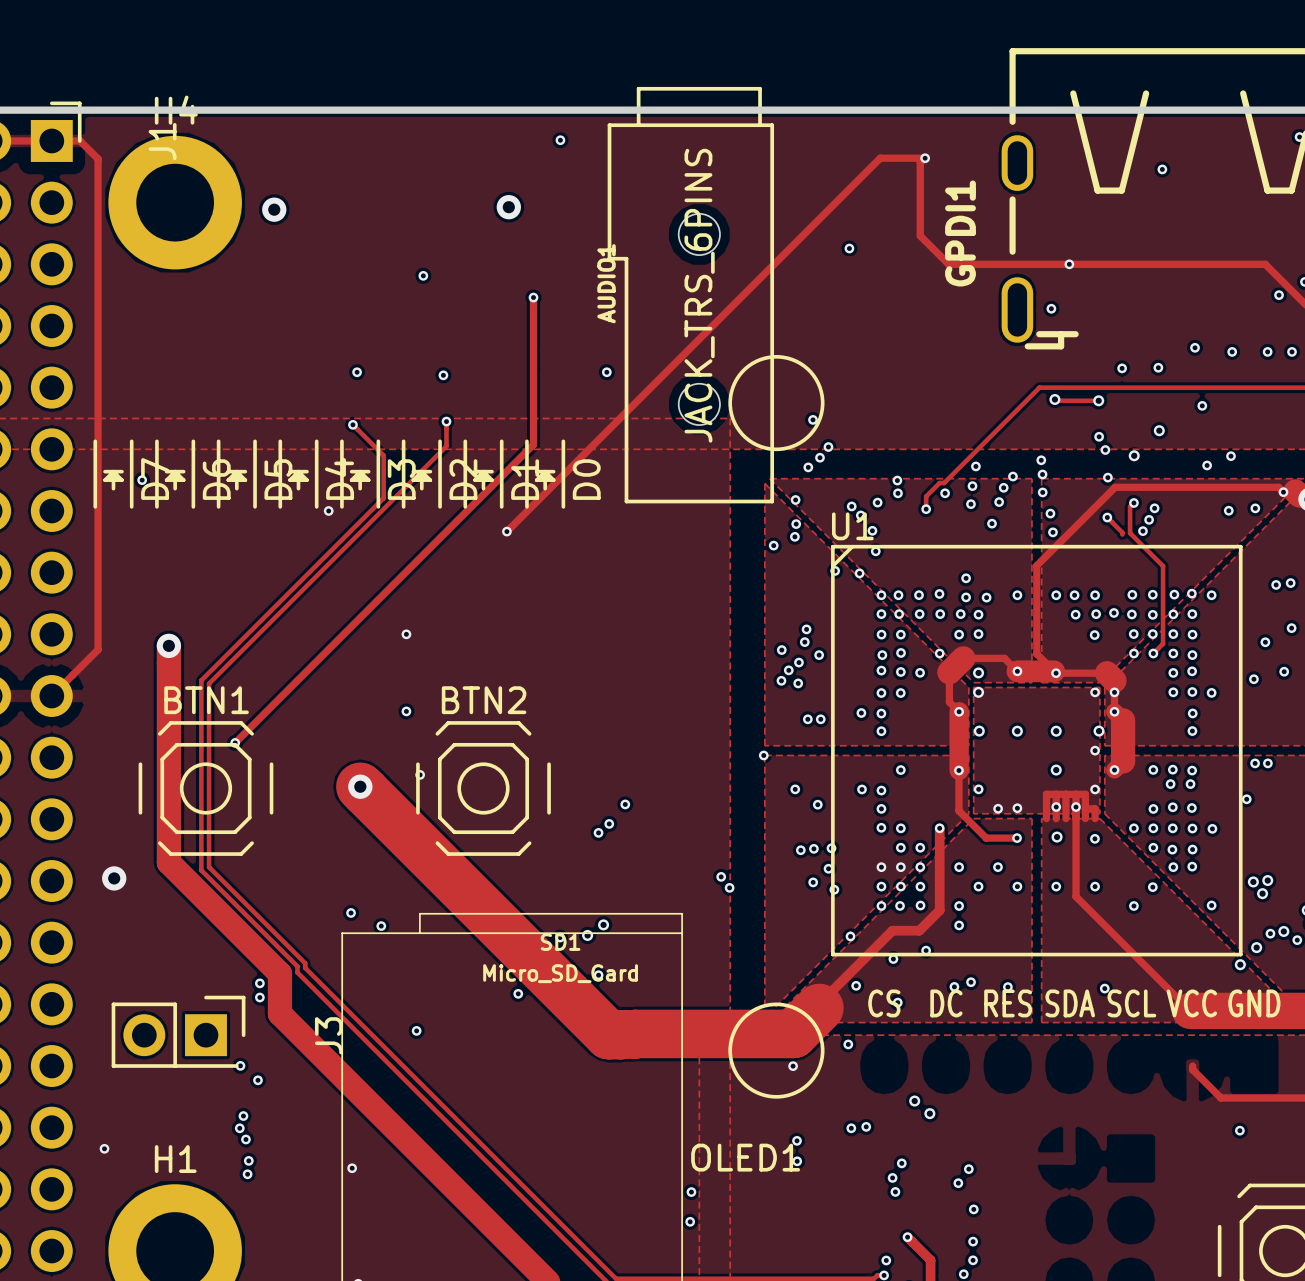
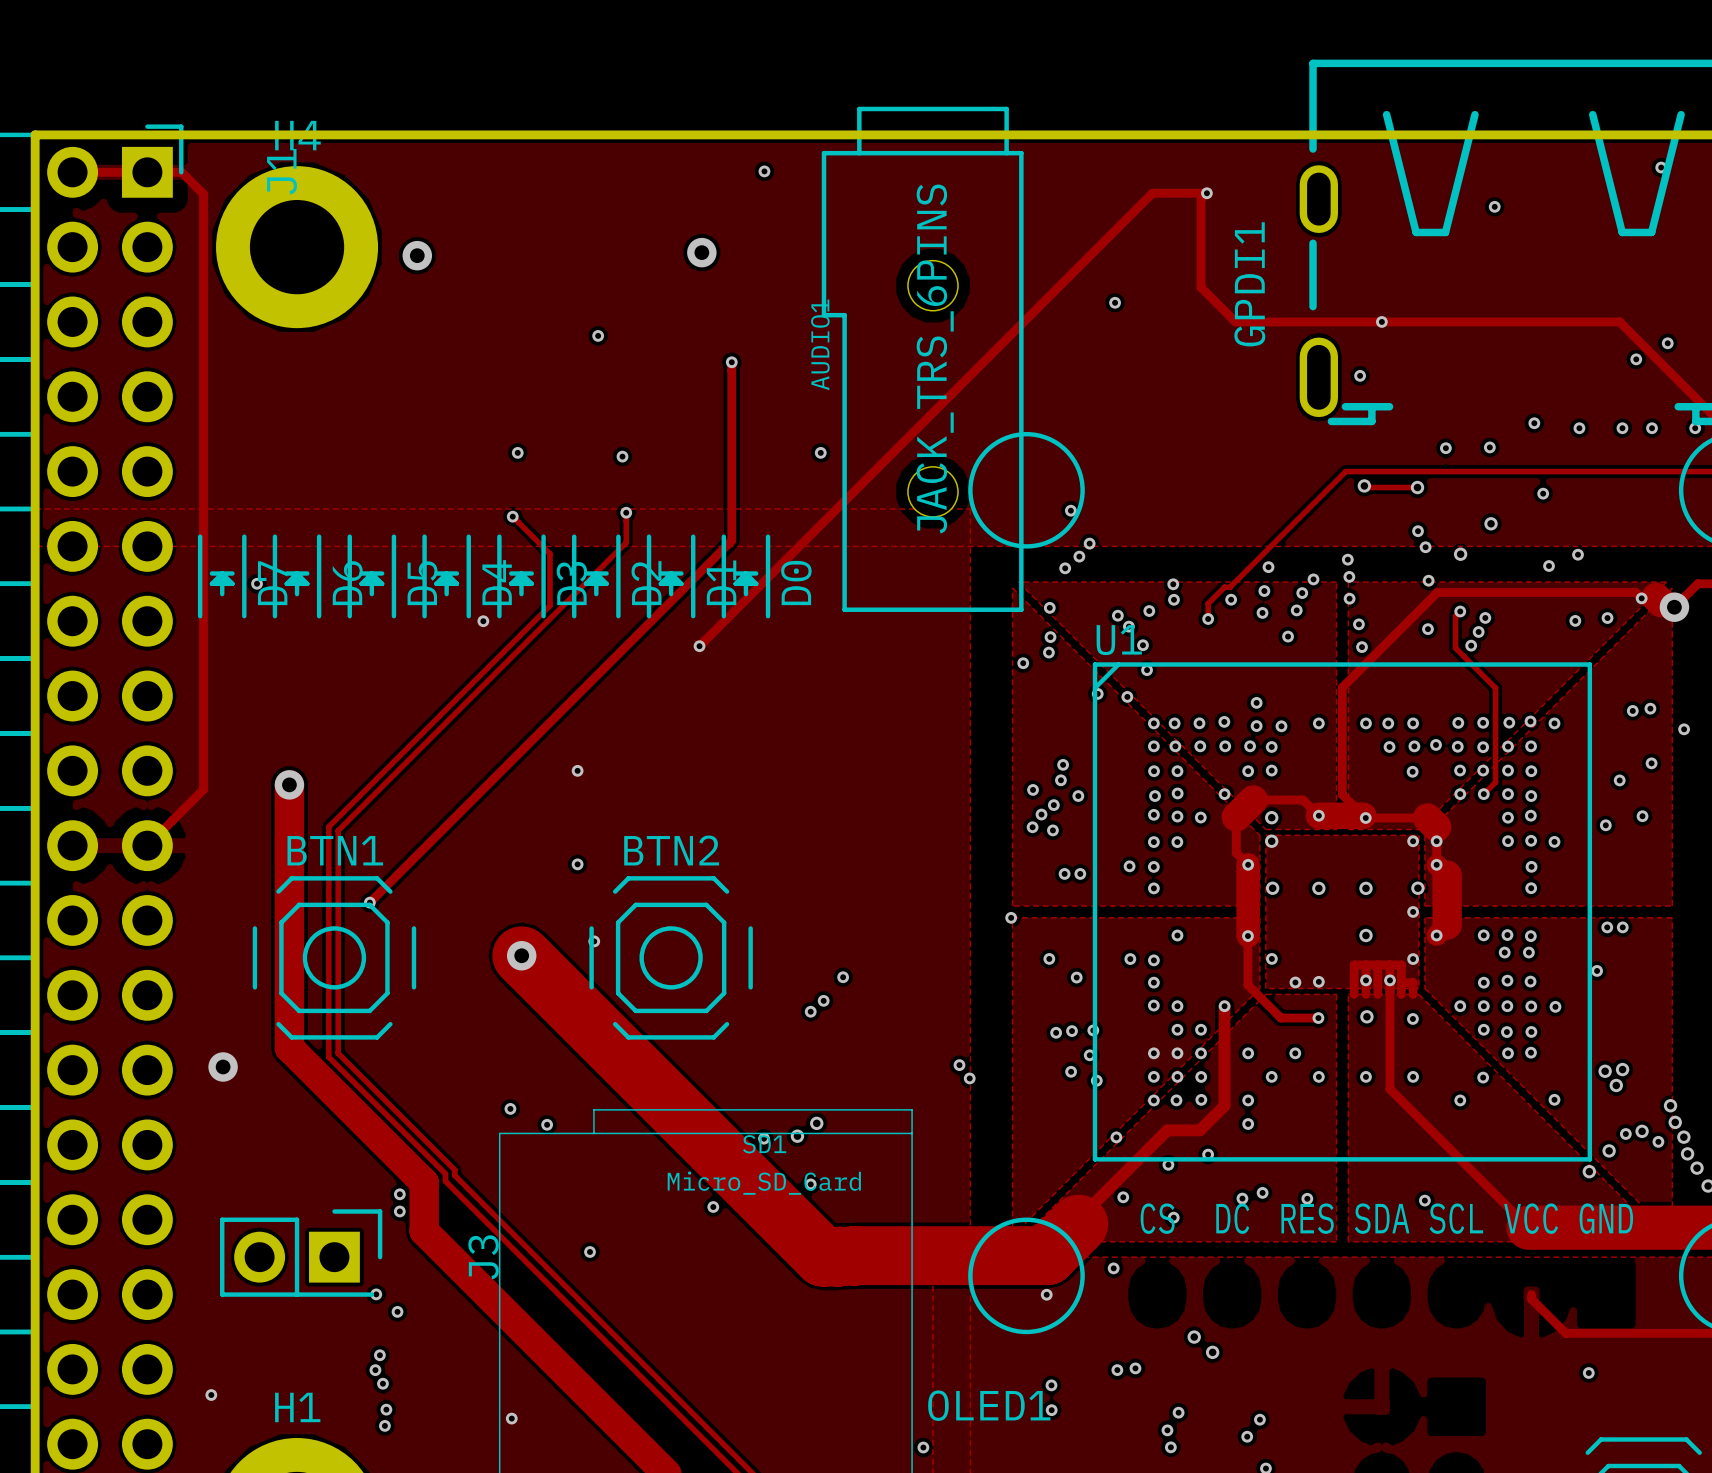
track: (1107, 517) (1122, 534) -> none

